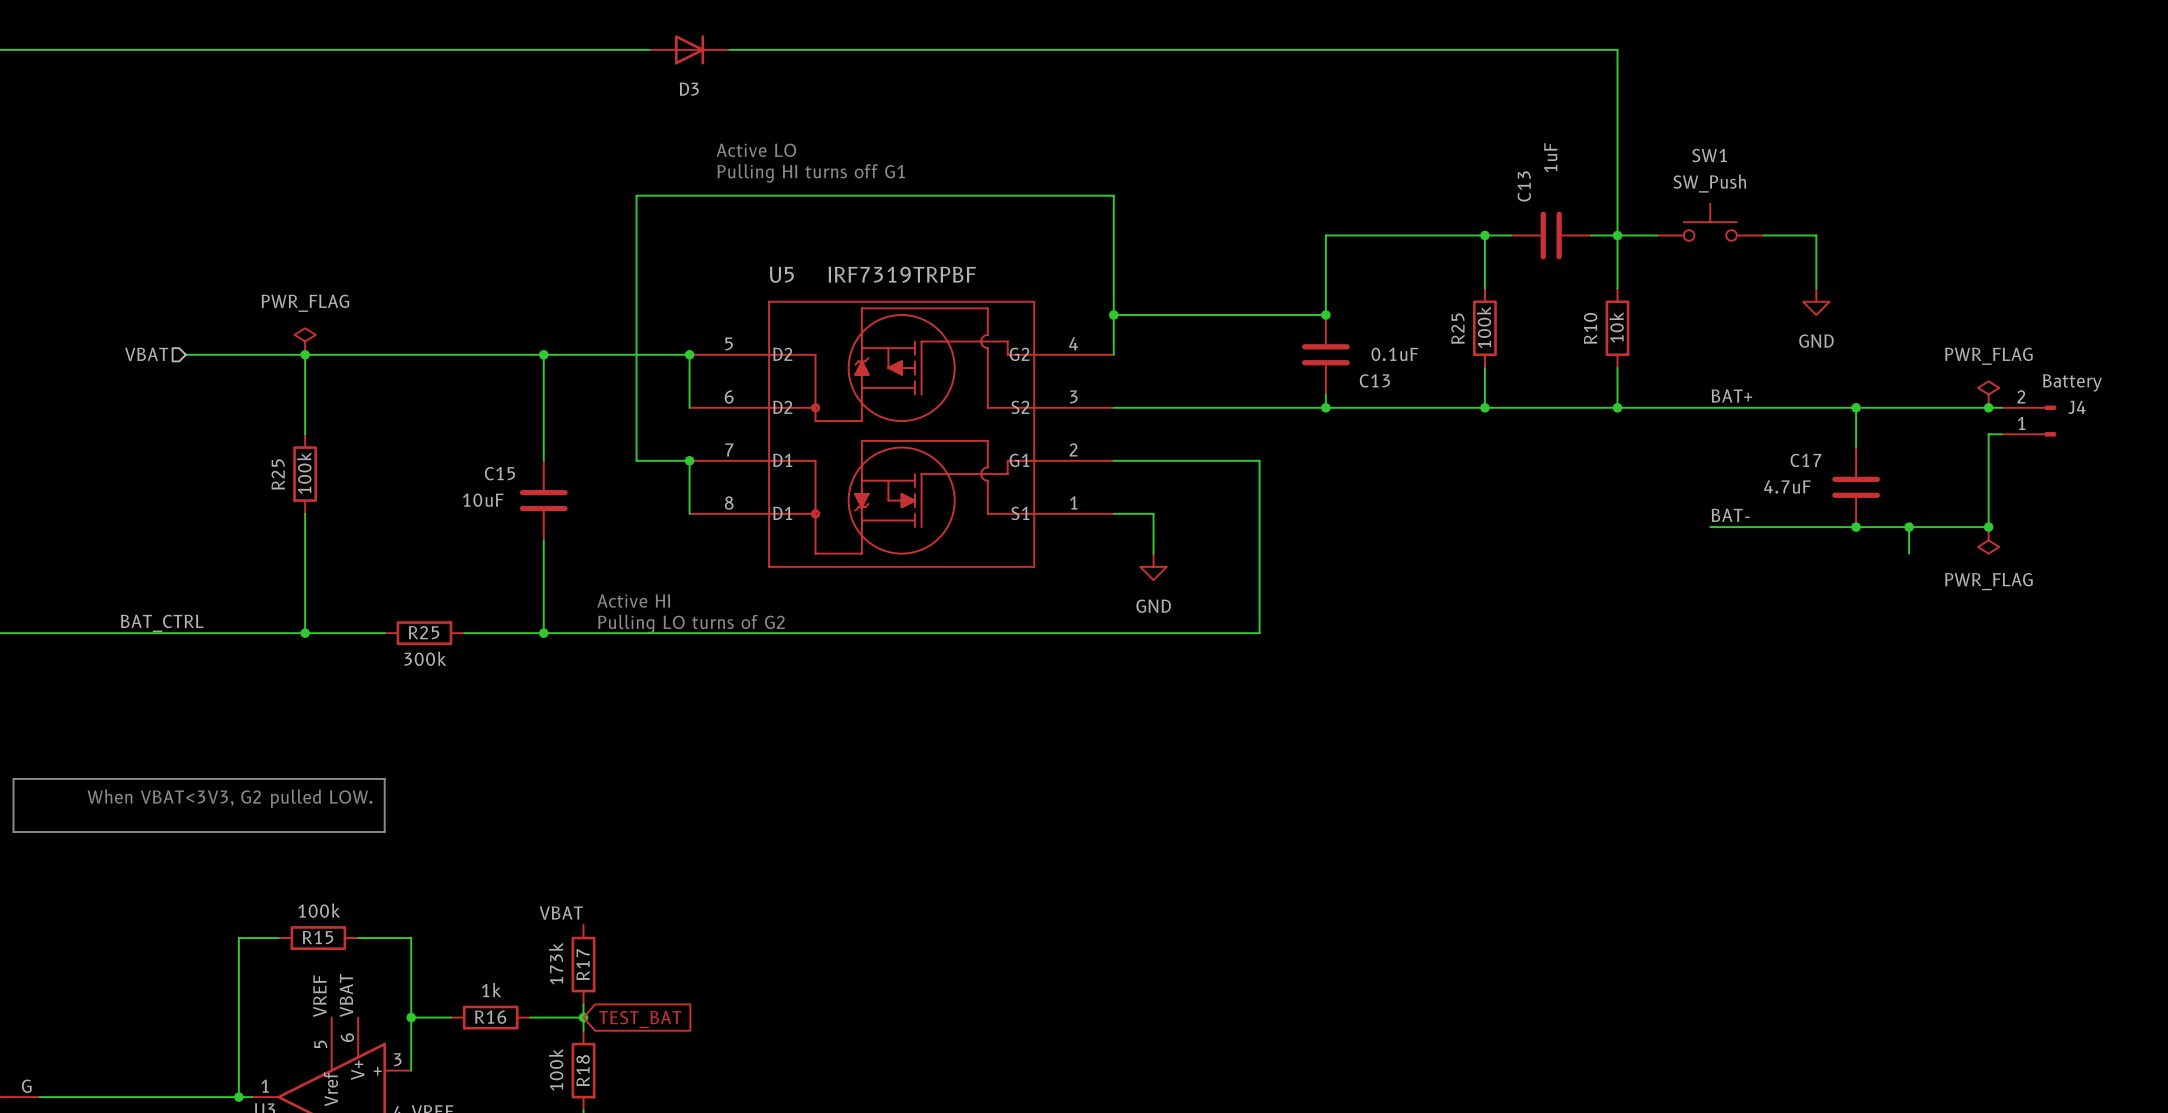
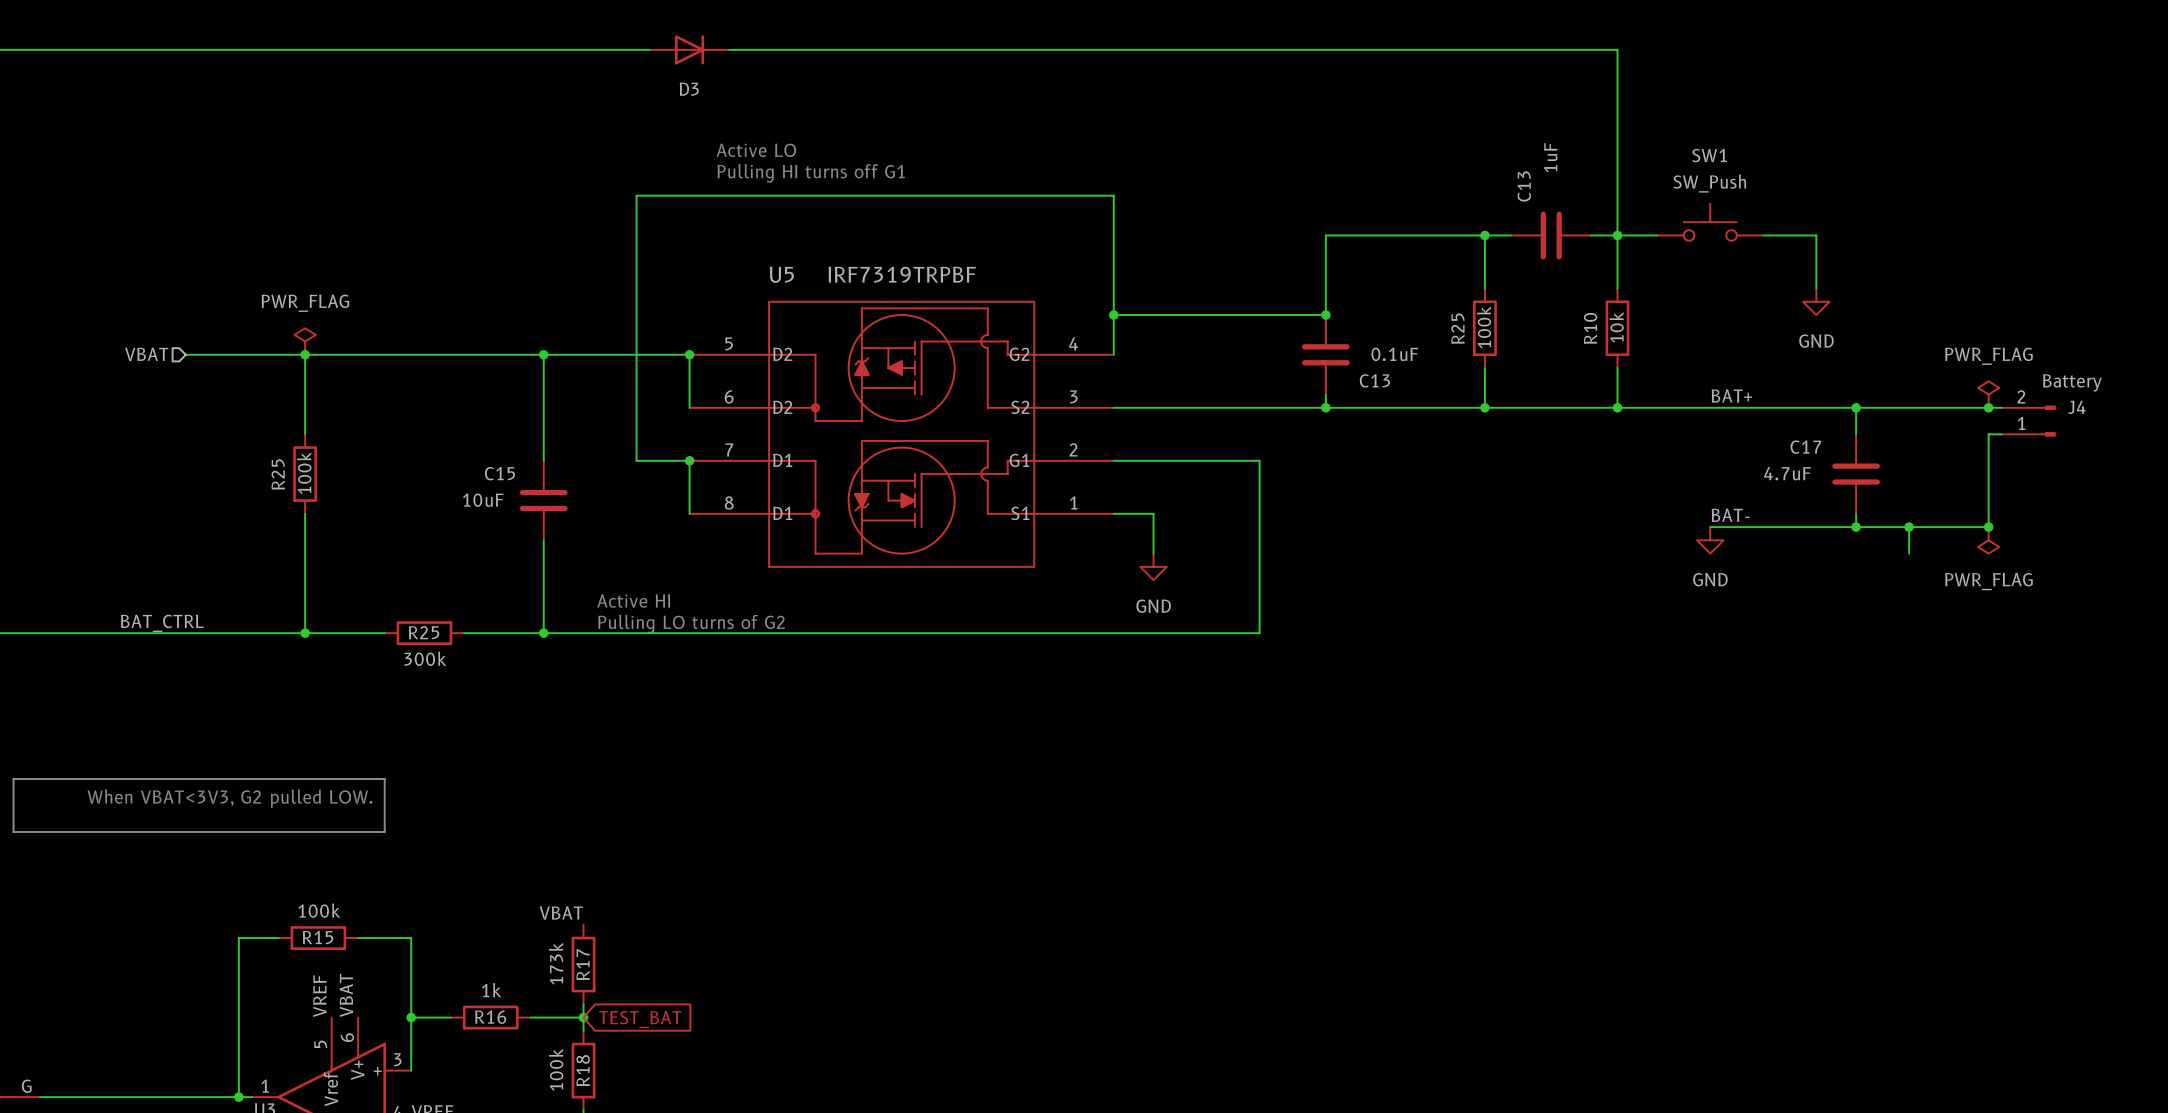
C17 position: (1856, 487) -> (1856, 474)
power symbol: none -> GND (1710, 540)

